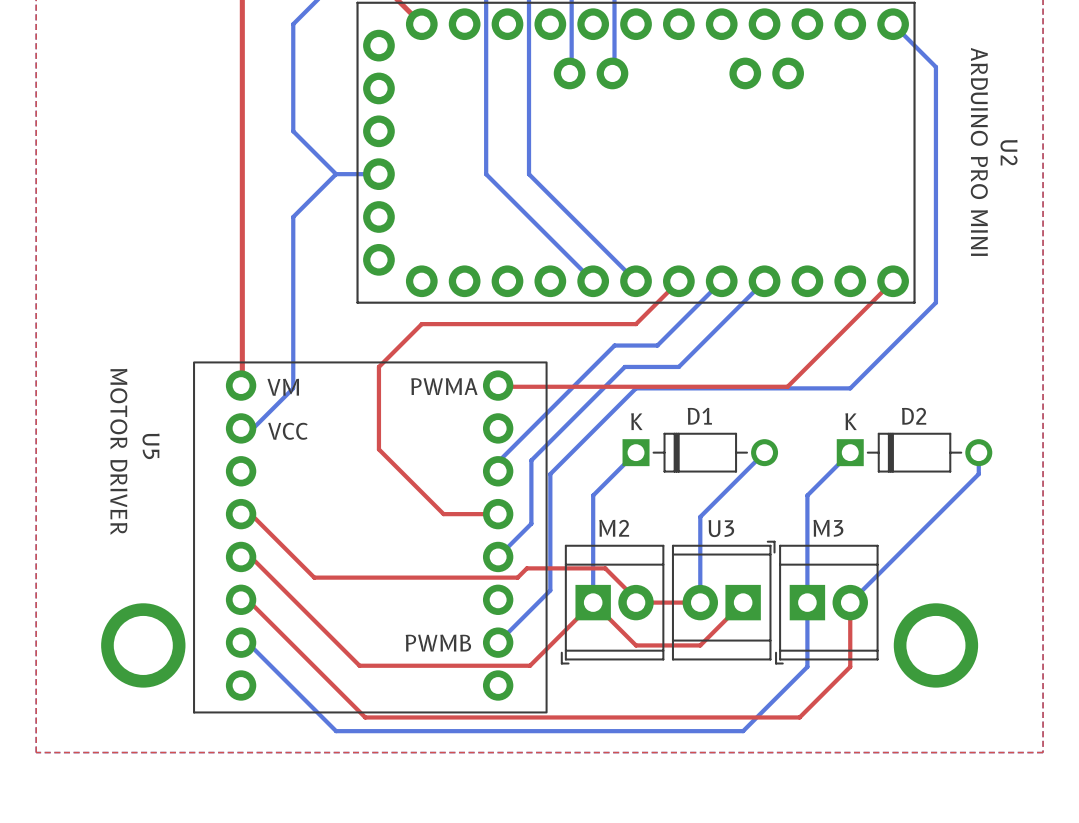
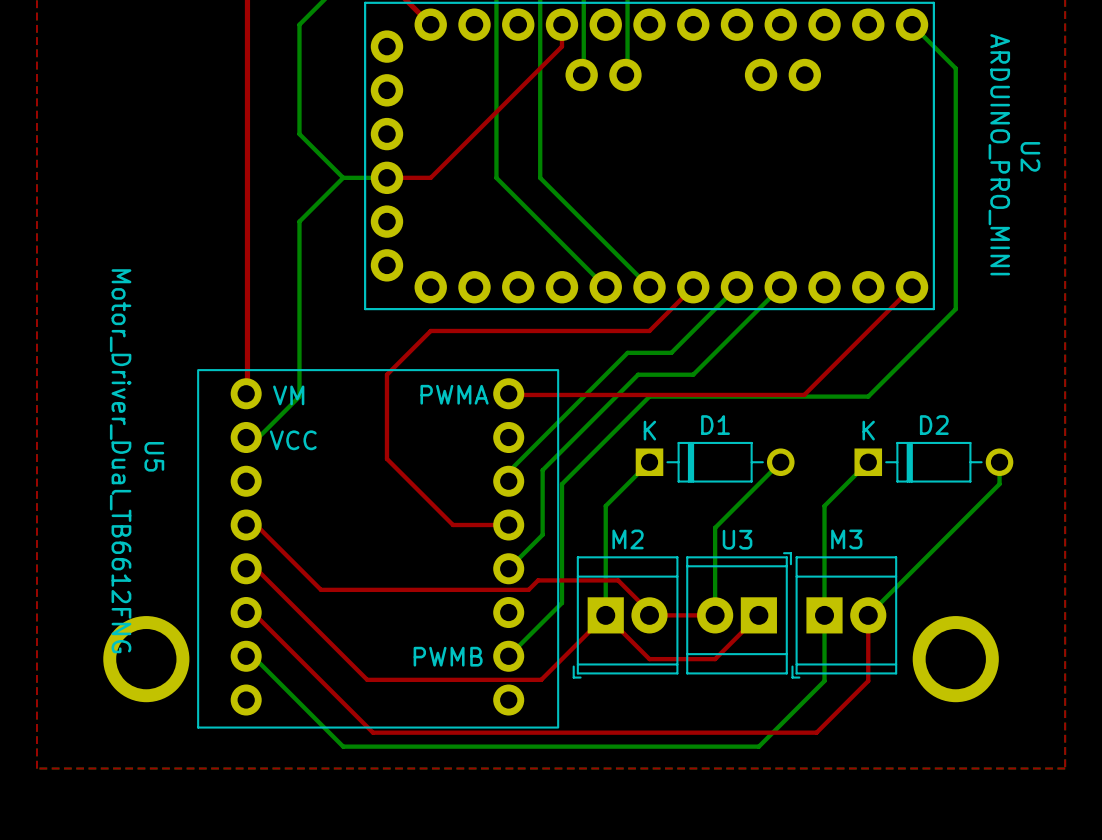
top track: none -> (561, 24) (561, 46) (430, 177) (386, 177)
U2 value: ARDUINO PRO MINI (979, 151) -> ARDUINO_PRO_MINI (999, 154)
U5 value: MOTOR DRIVER (118, 451) -> Motor_Driver_Dual_TB6612FNG (120, 461)

